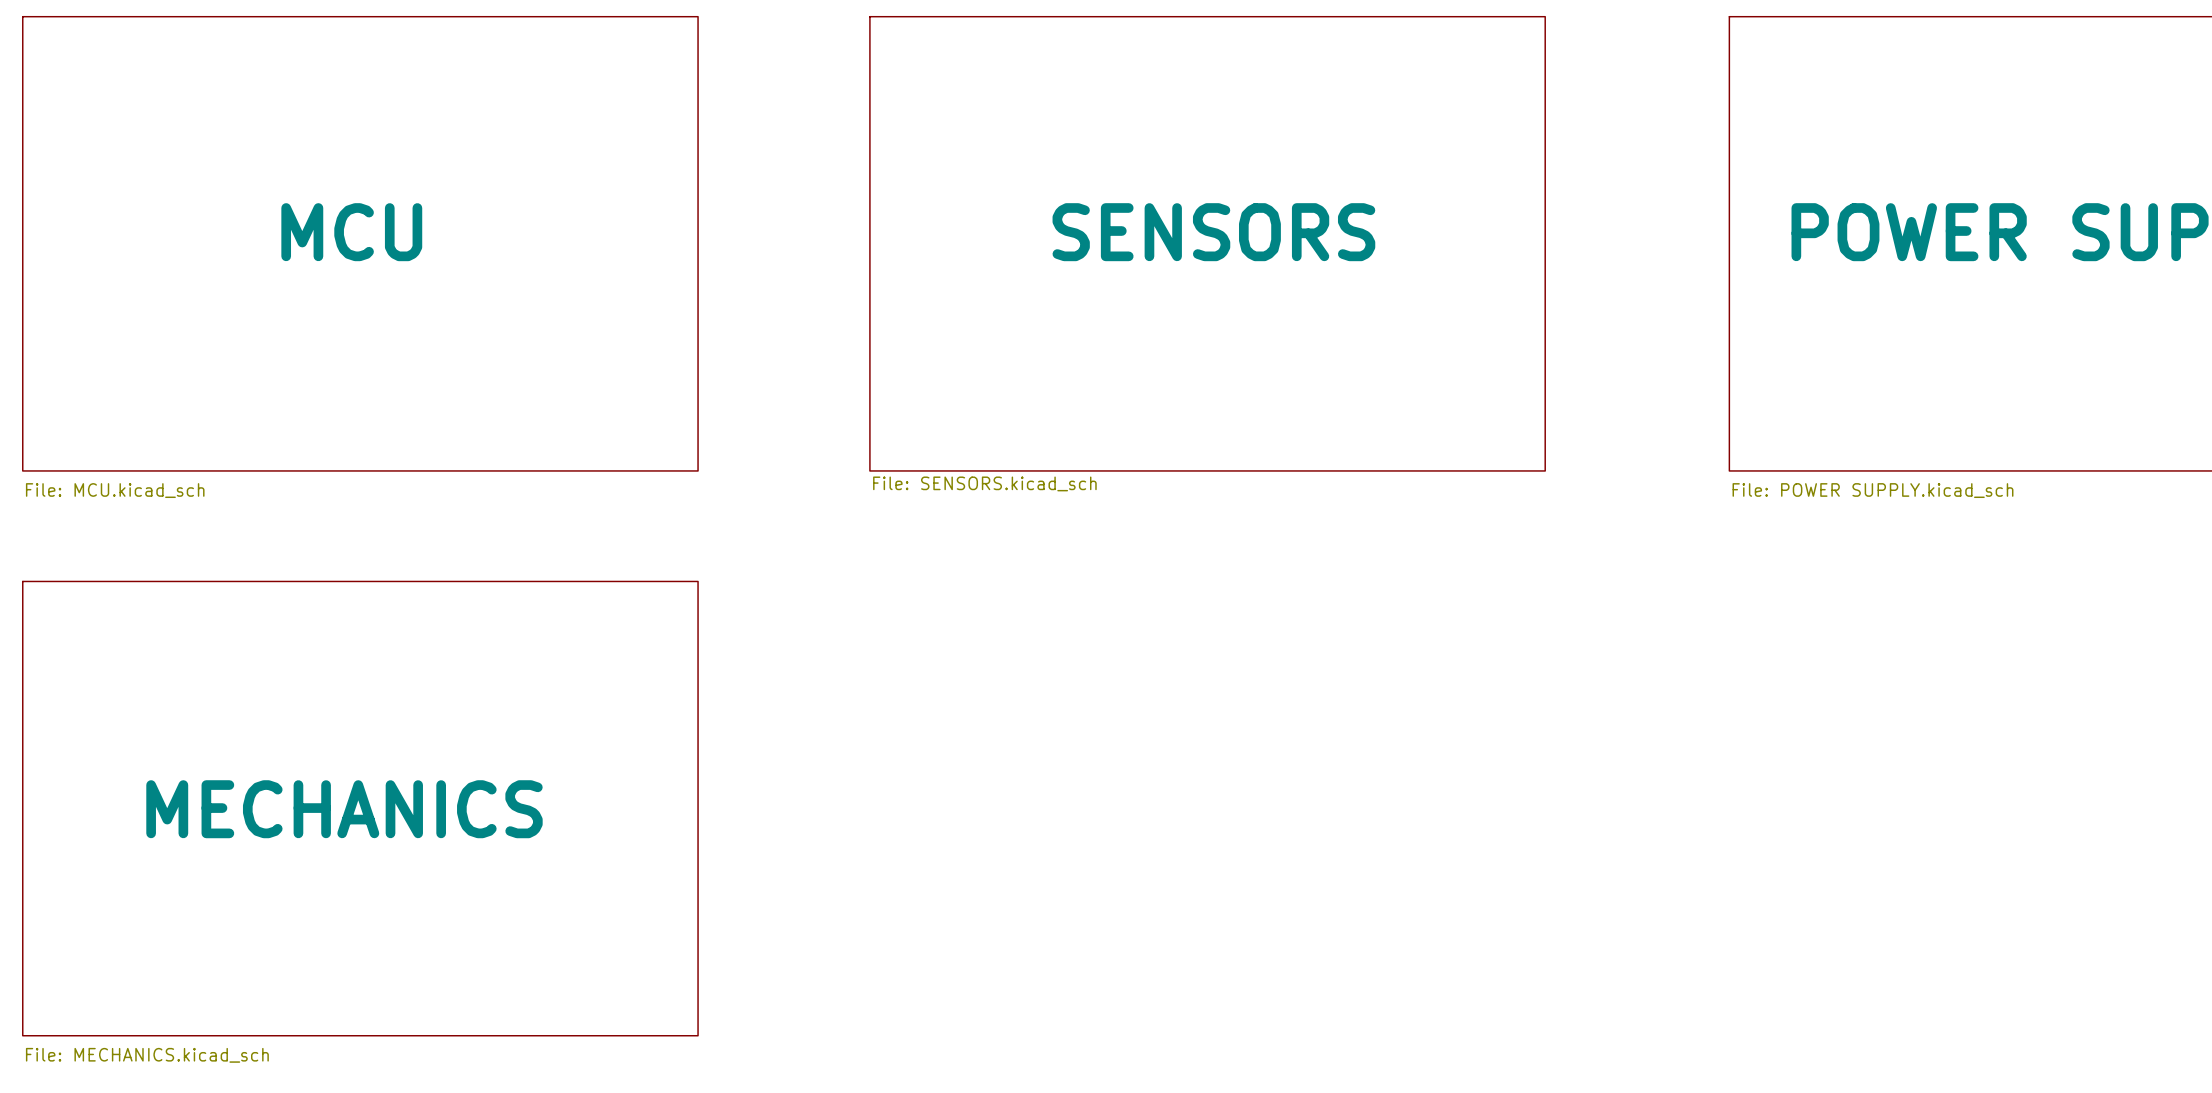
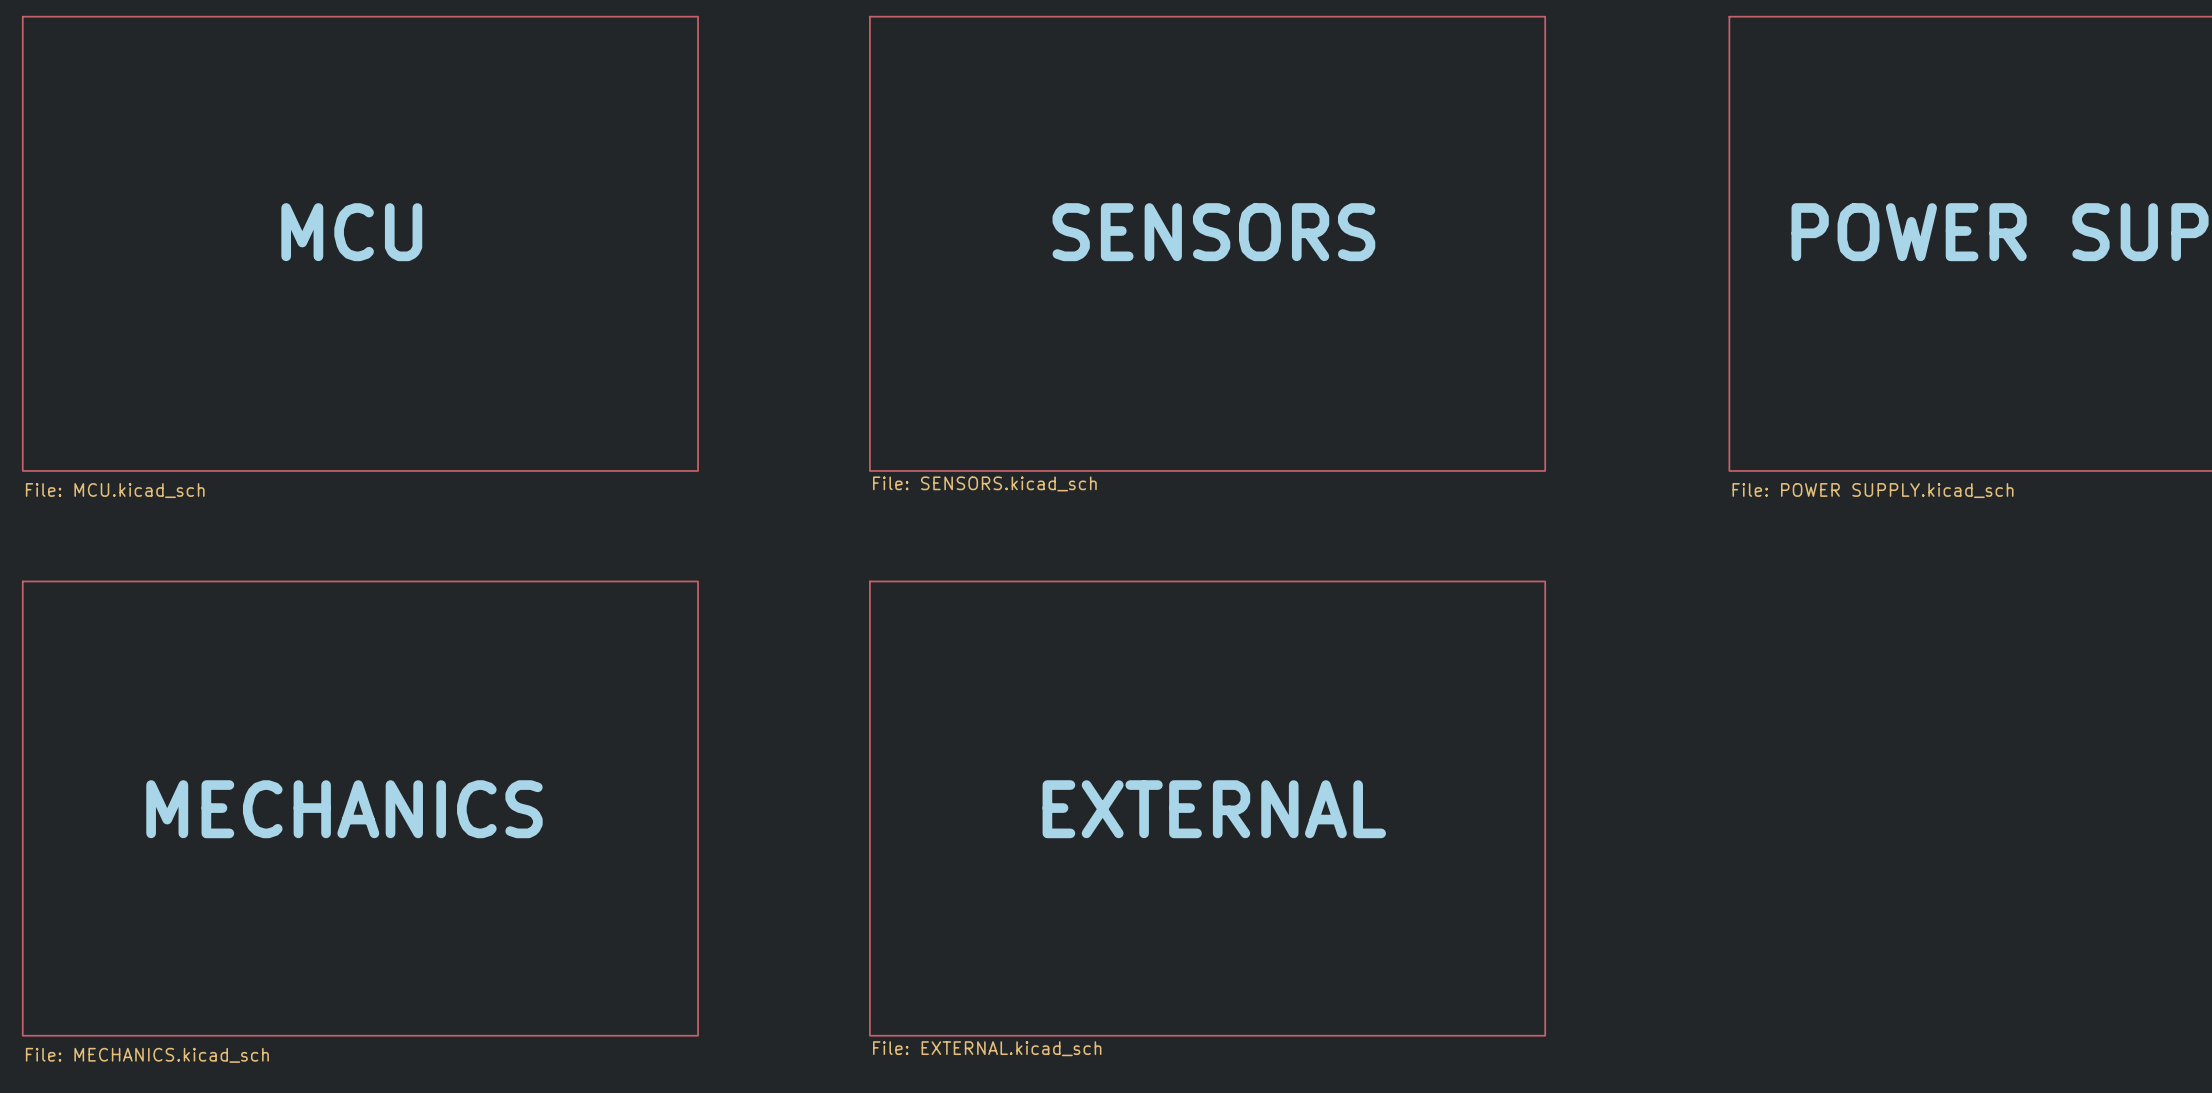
sheet EXTERNAL: none -> File: EXTERNAL.kicad_sch (1207, 808)

